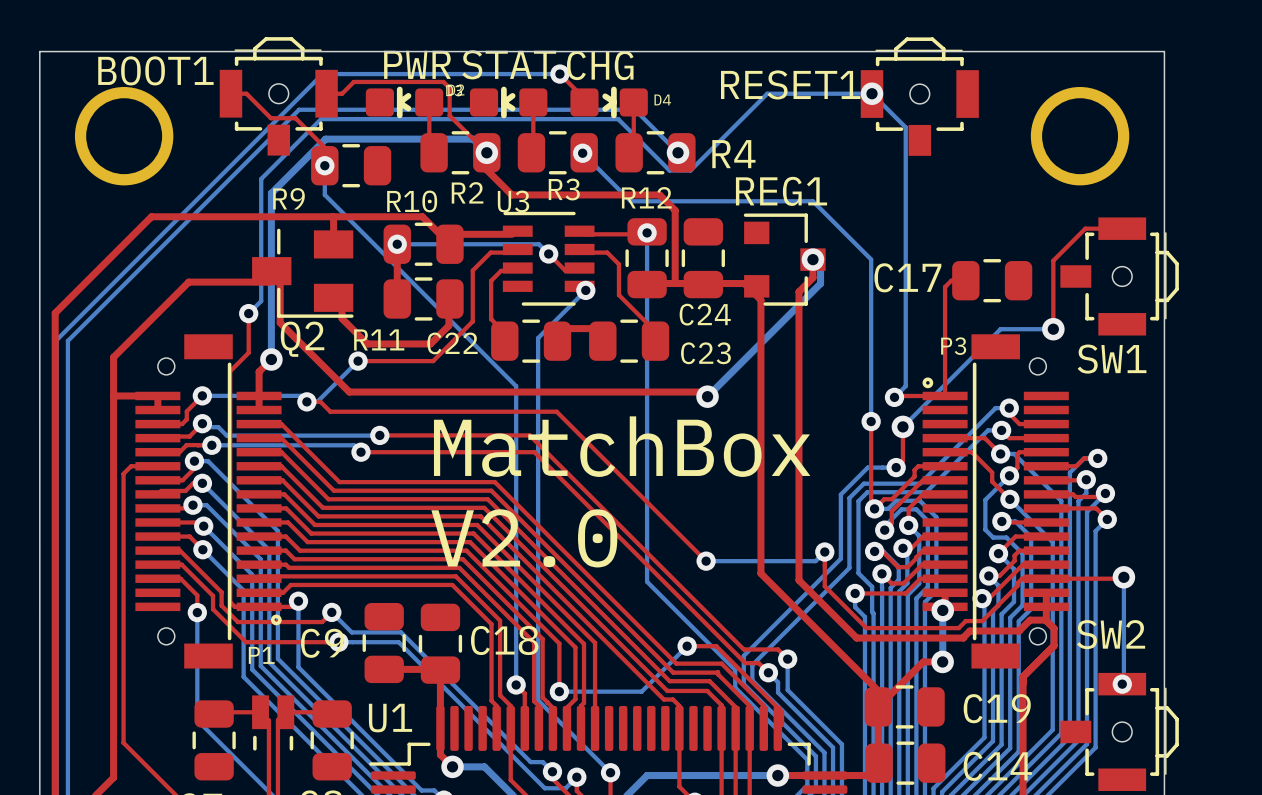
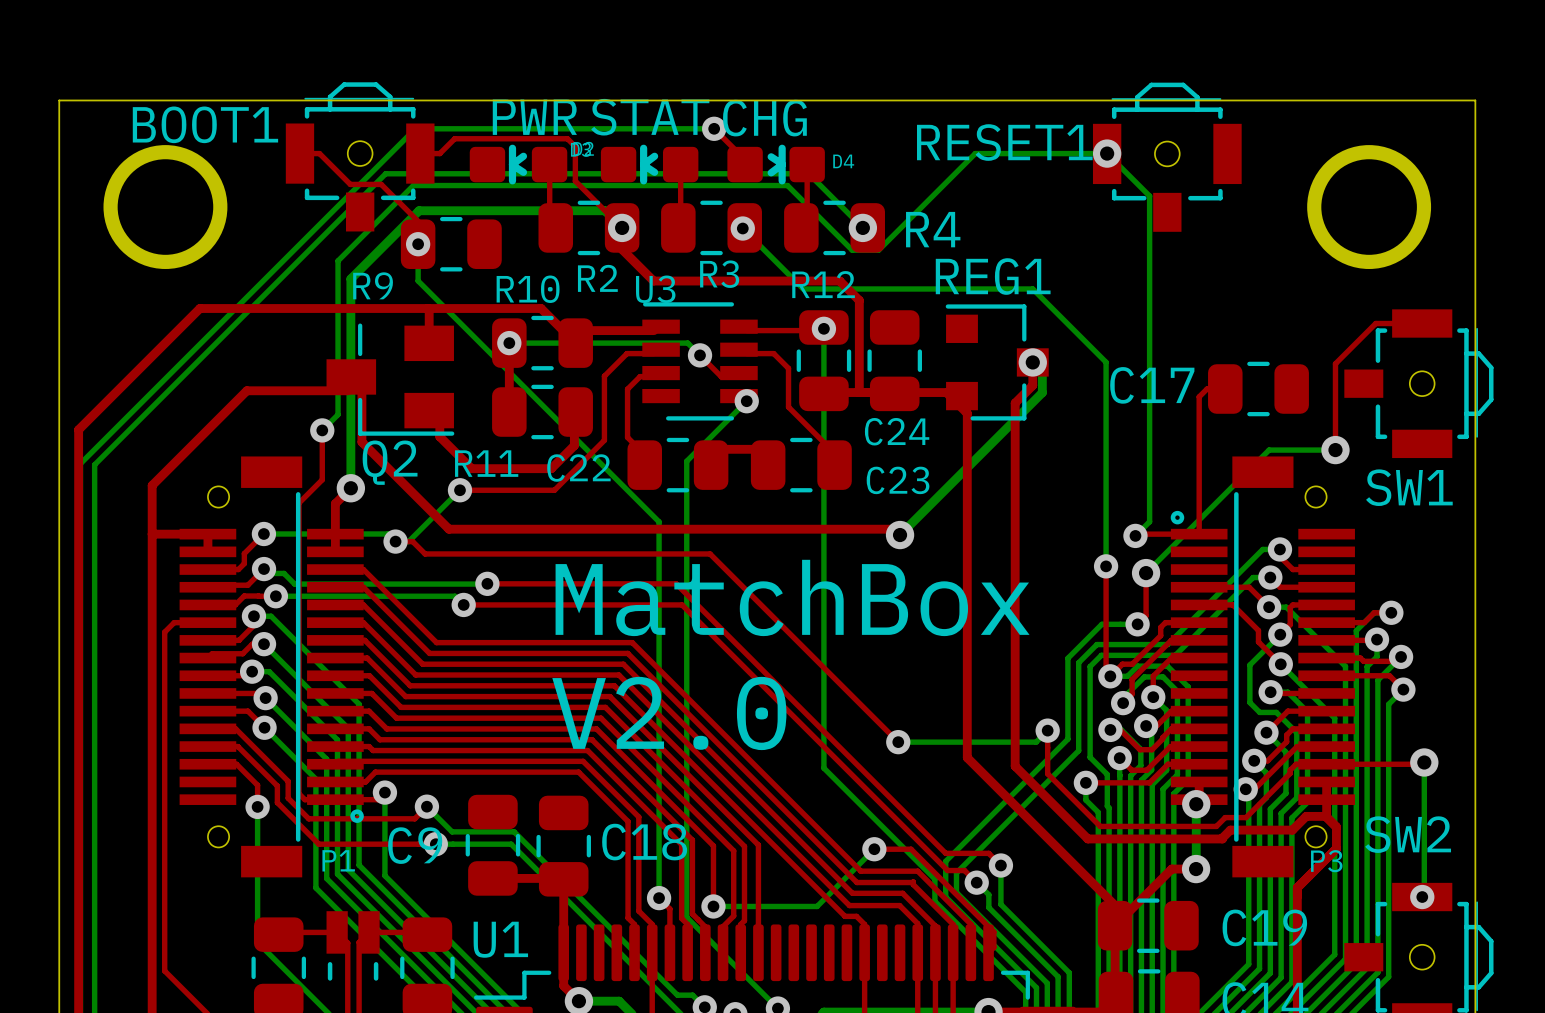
P3 name position: P3 (953, 346) -> P3 (1326, 861)

